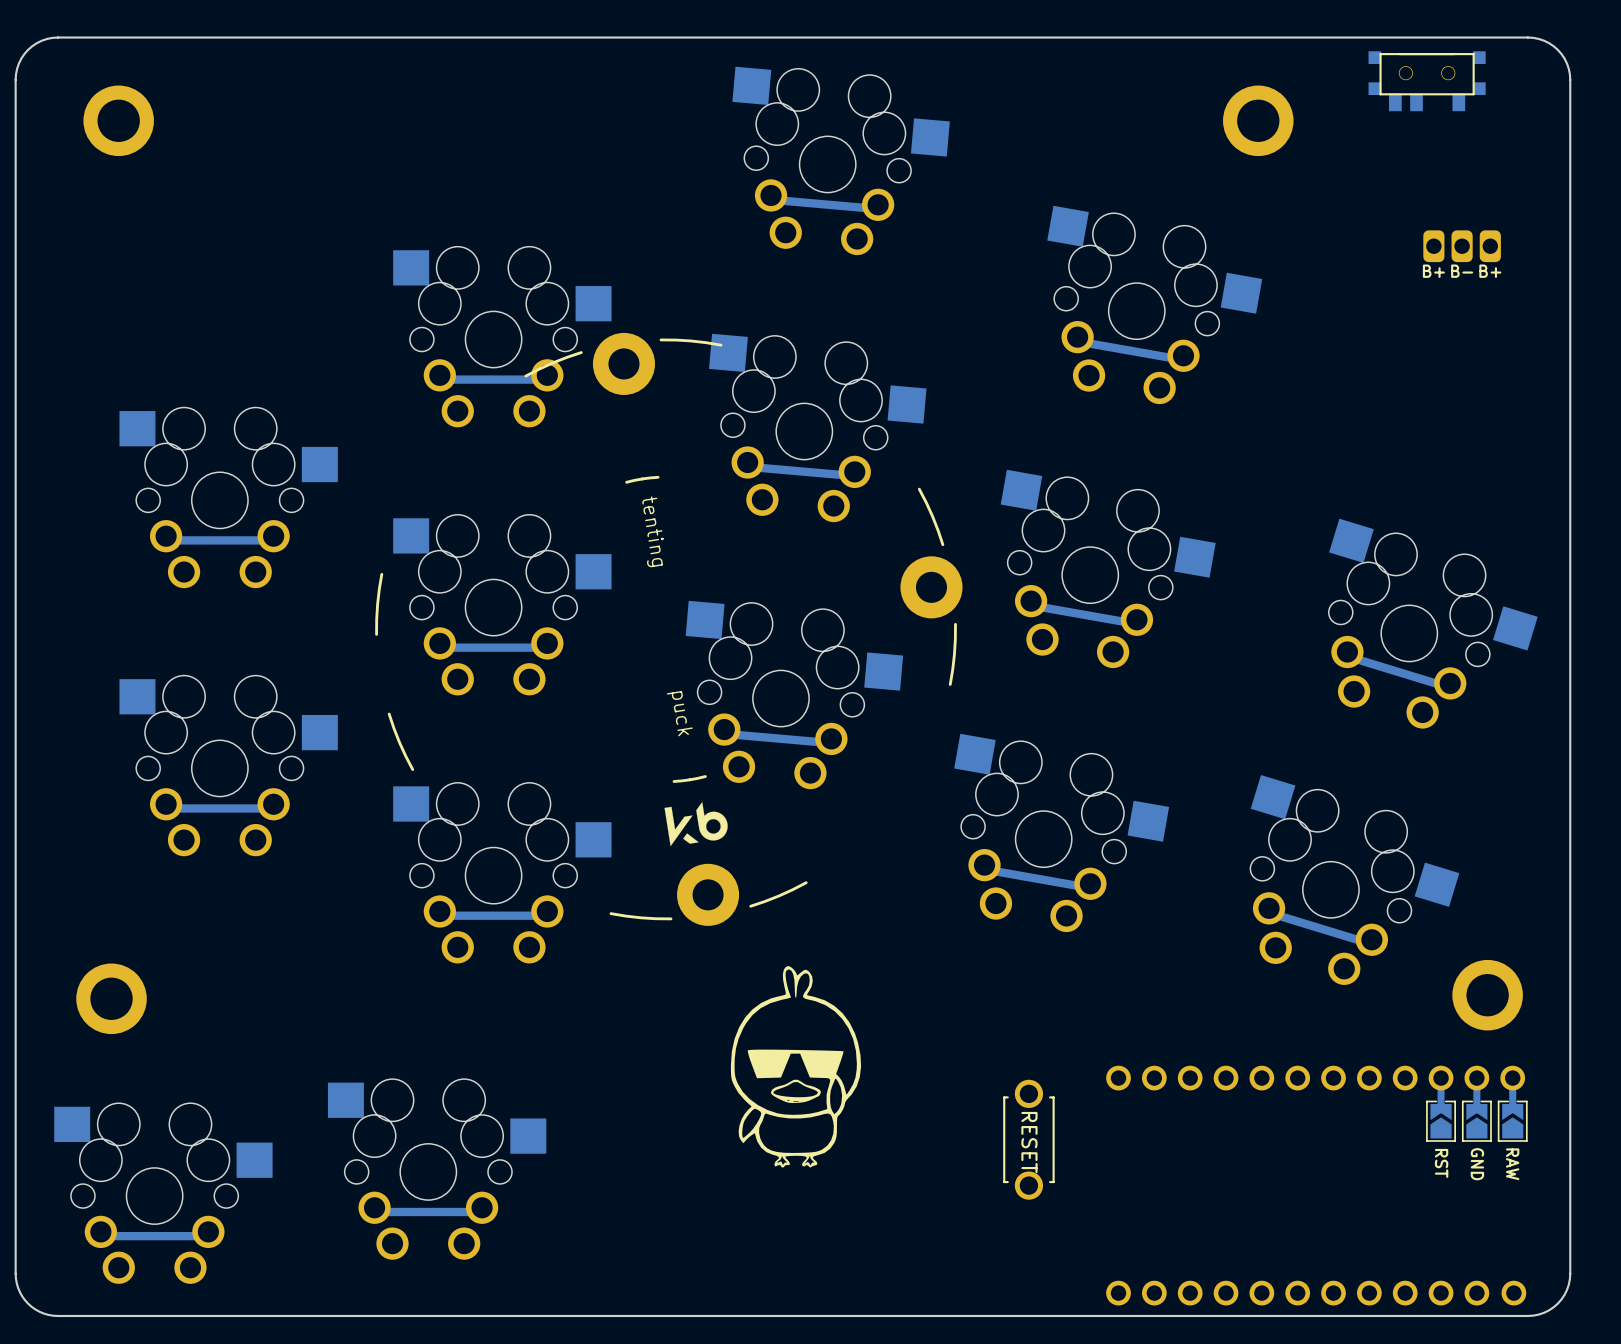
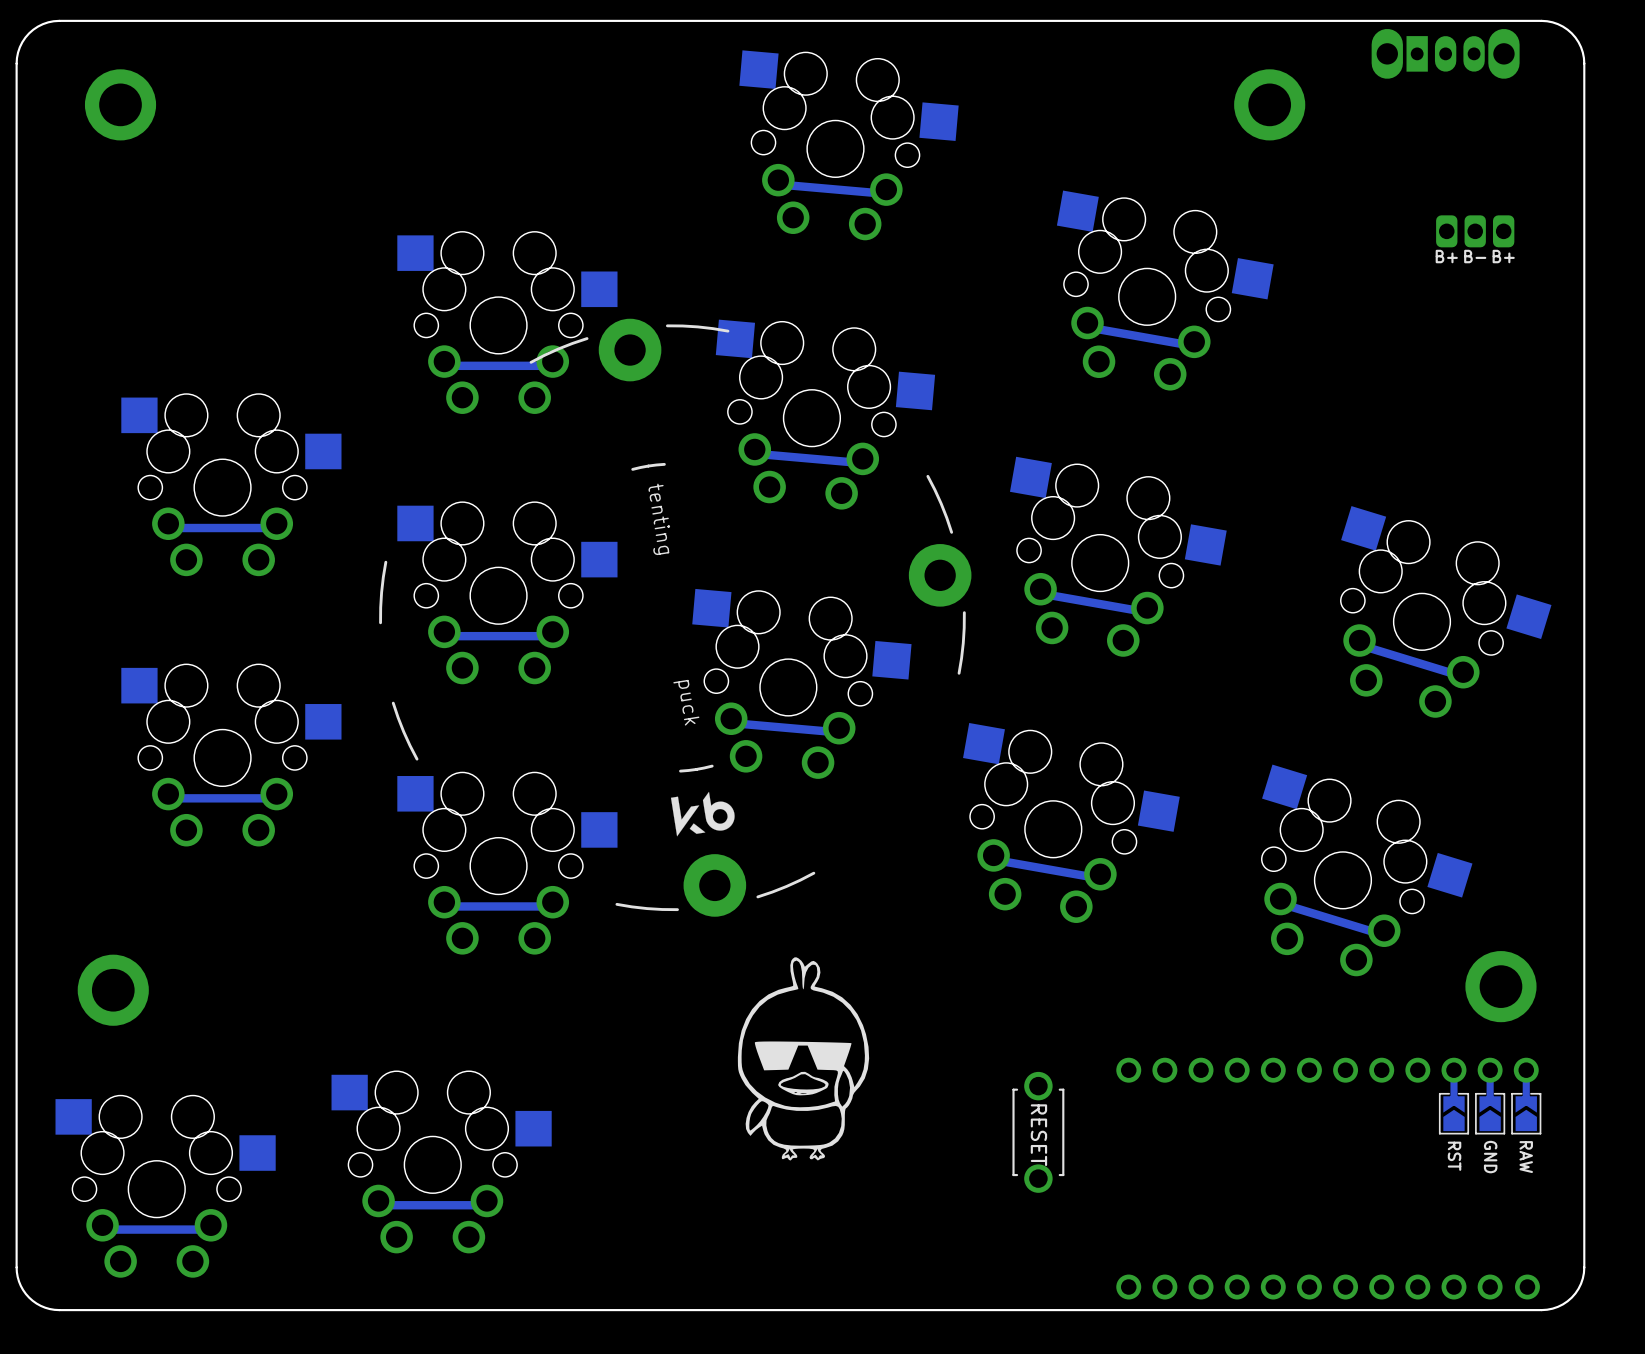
part footprint: [1368, 51, 1486, 112] -> [1371, 28, 1520, 79]

